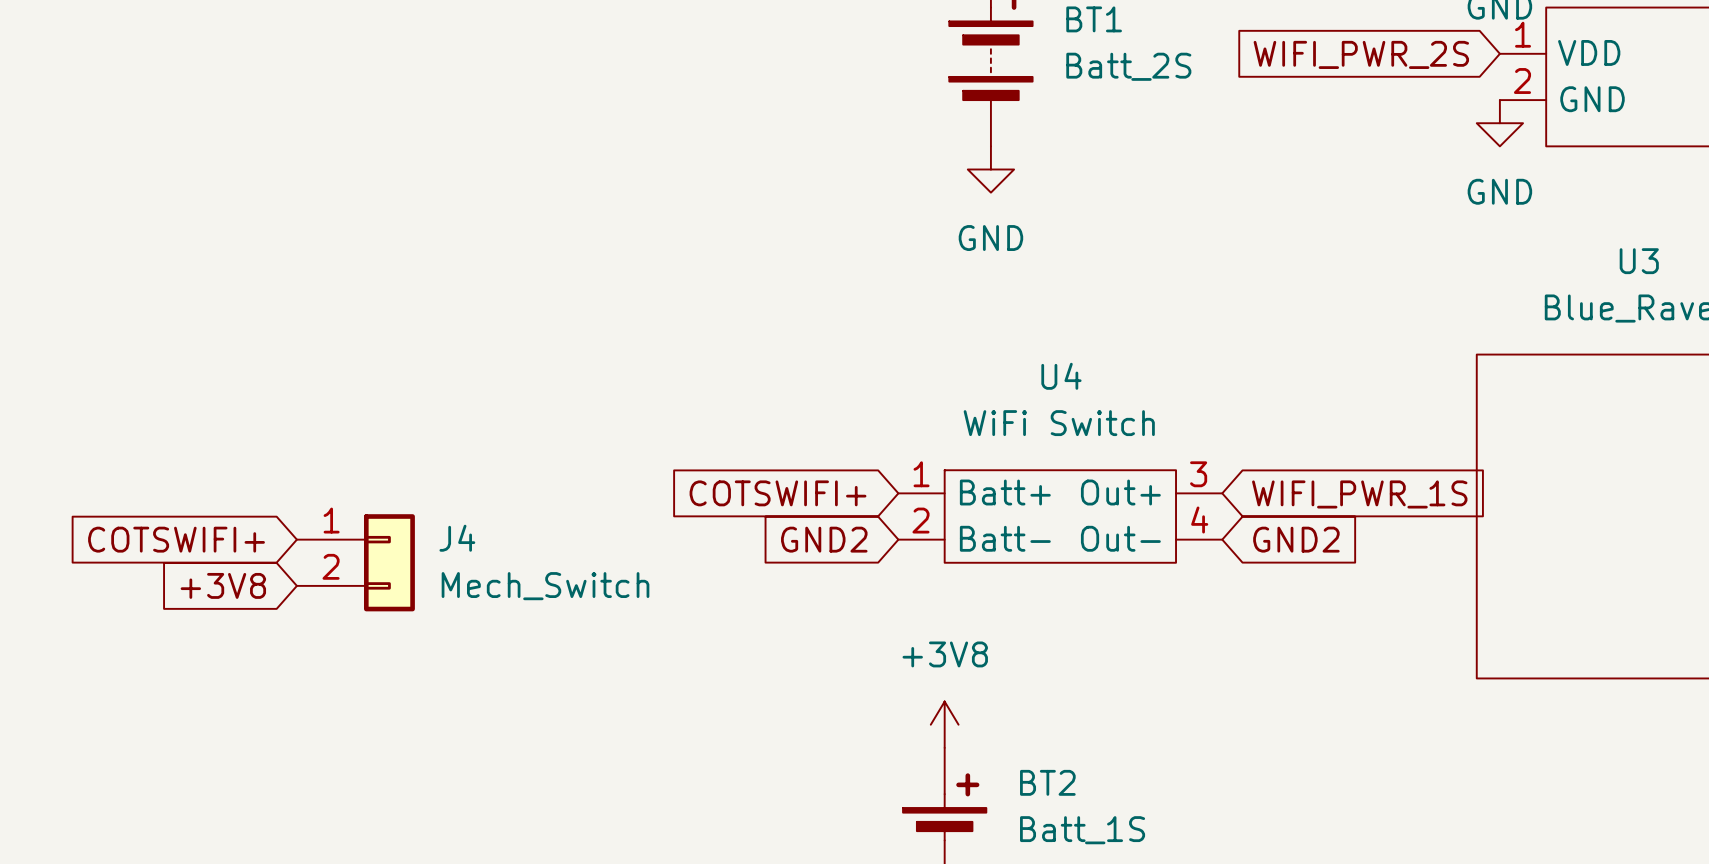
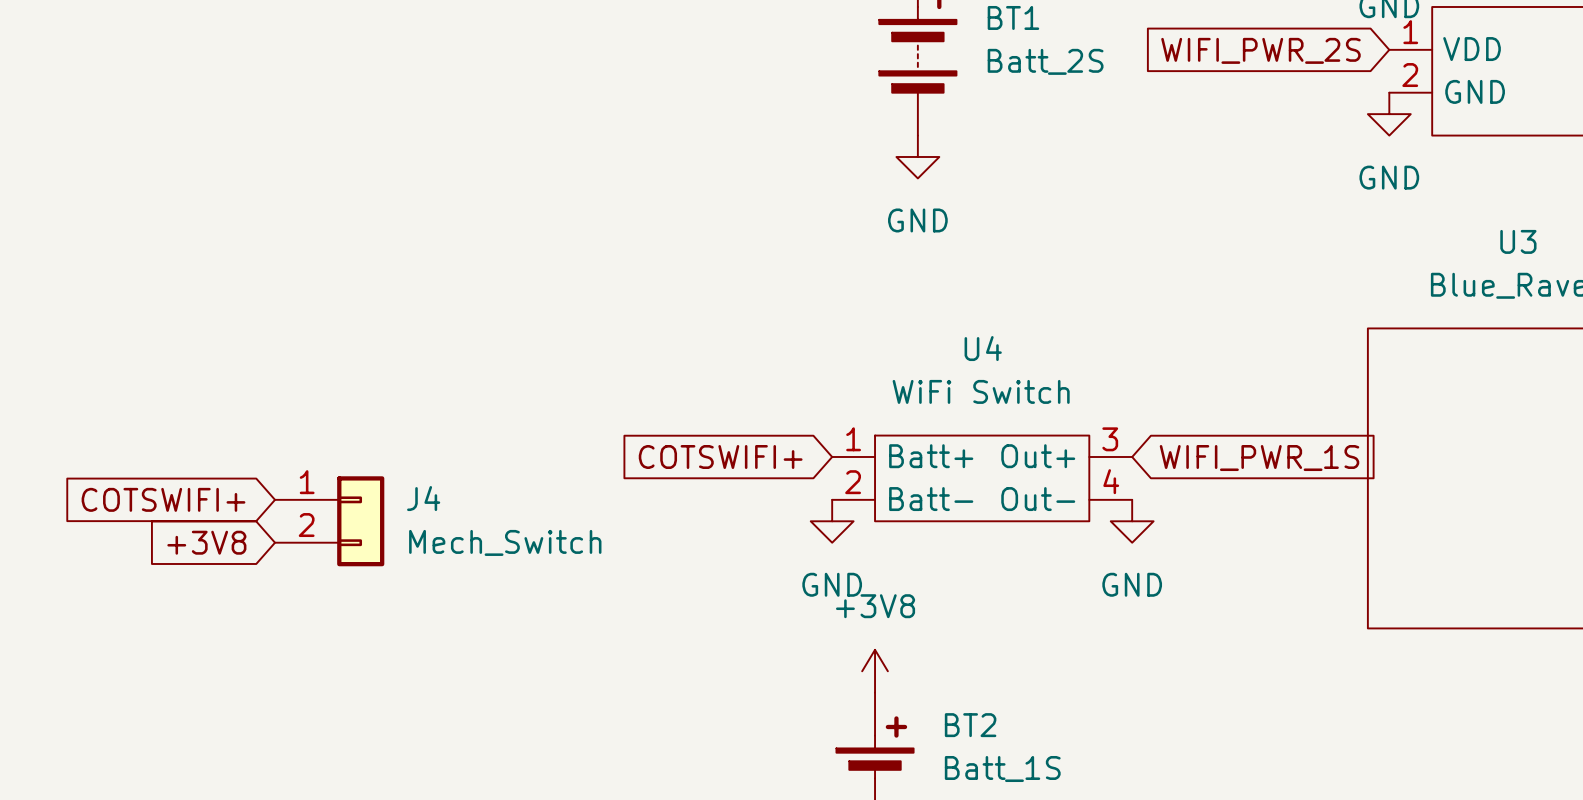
global label: GND2 (824, 539) -> none
global label: GND2 (1296, 539) -> none
power symbol: none -> GND (832, 521)
power symbol: none -> GND (1132, 521)

